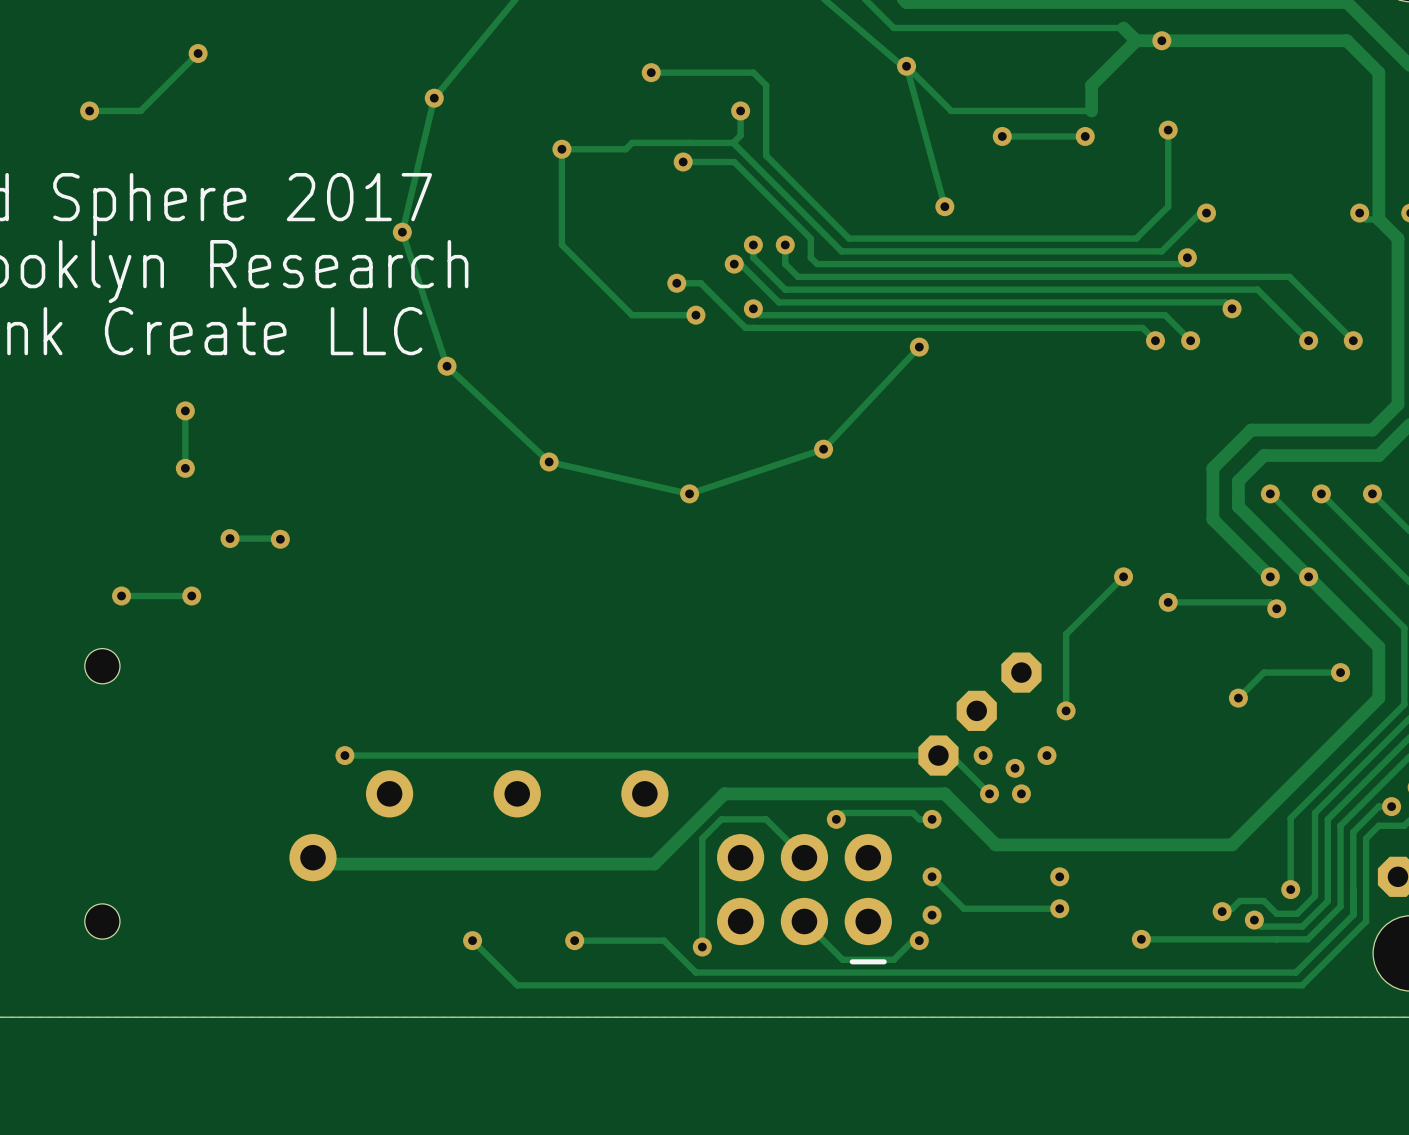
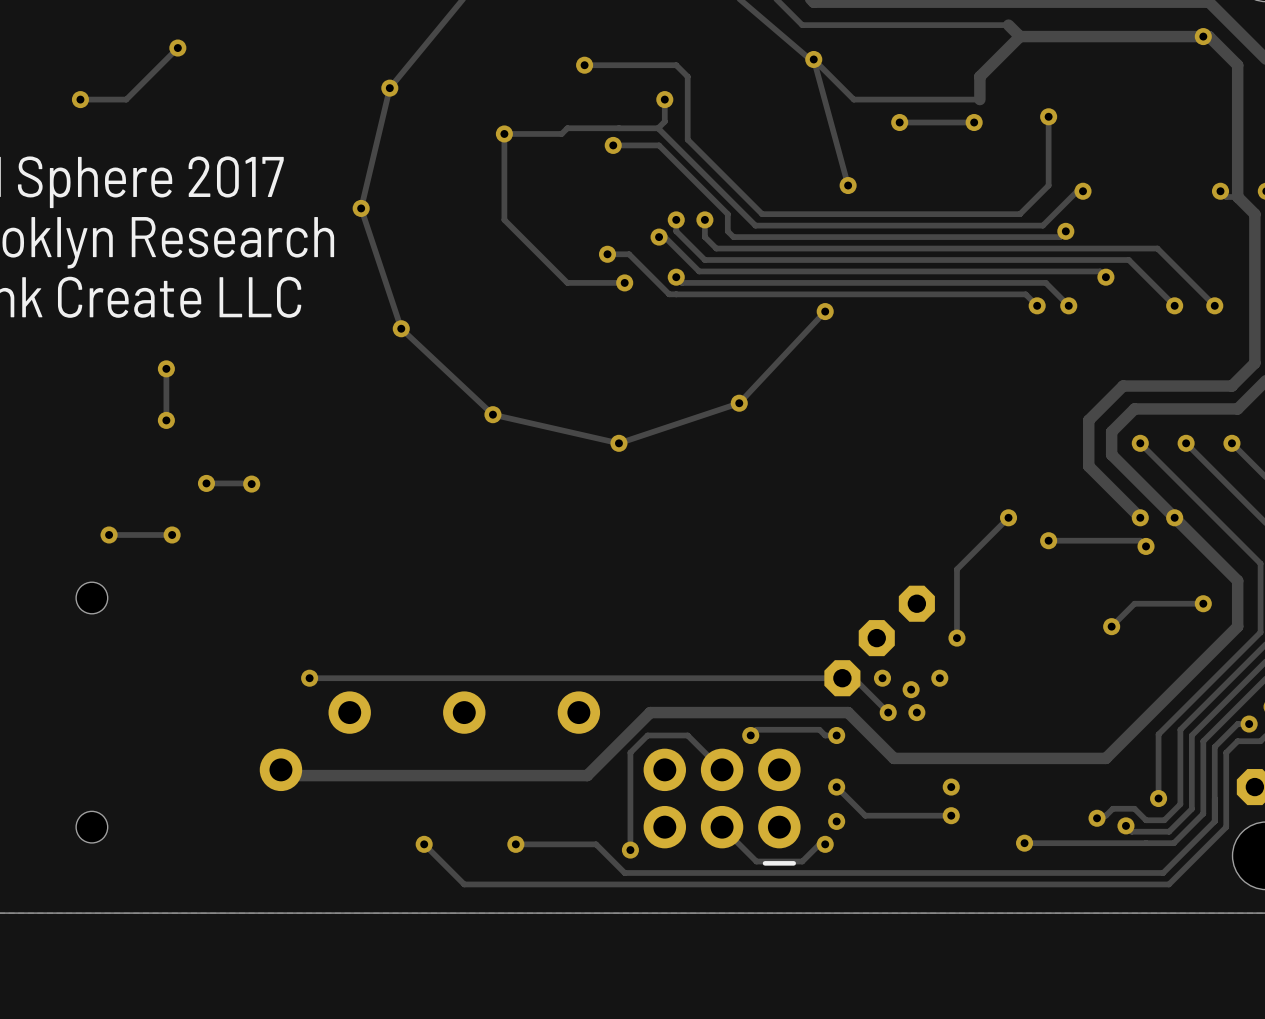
via: (1161, 40) -> none
via: none -> (1203, 36)

